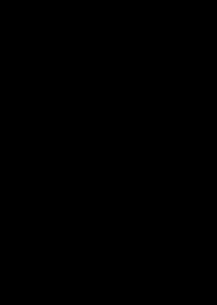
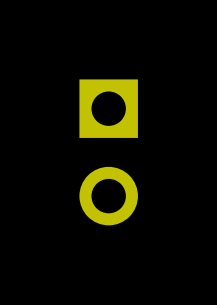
part: none -> (108, 152)

